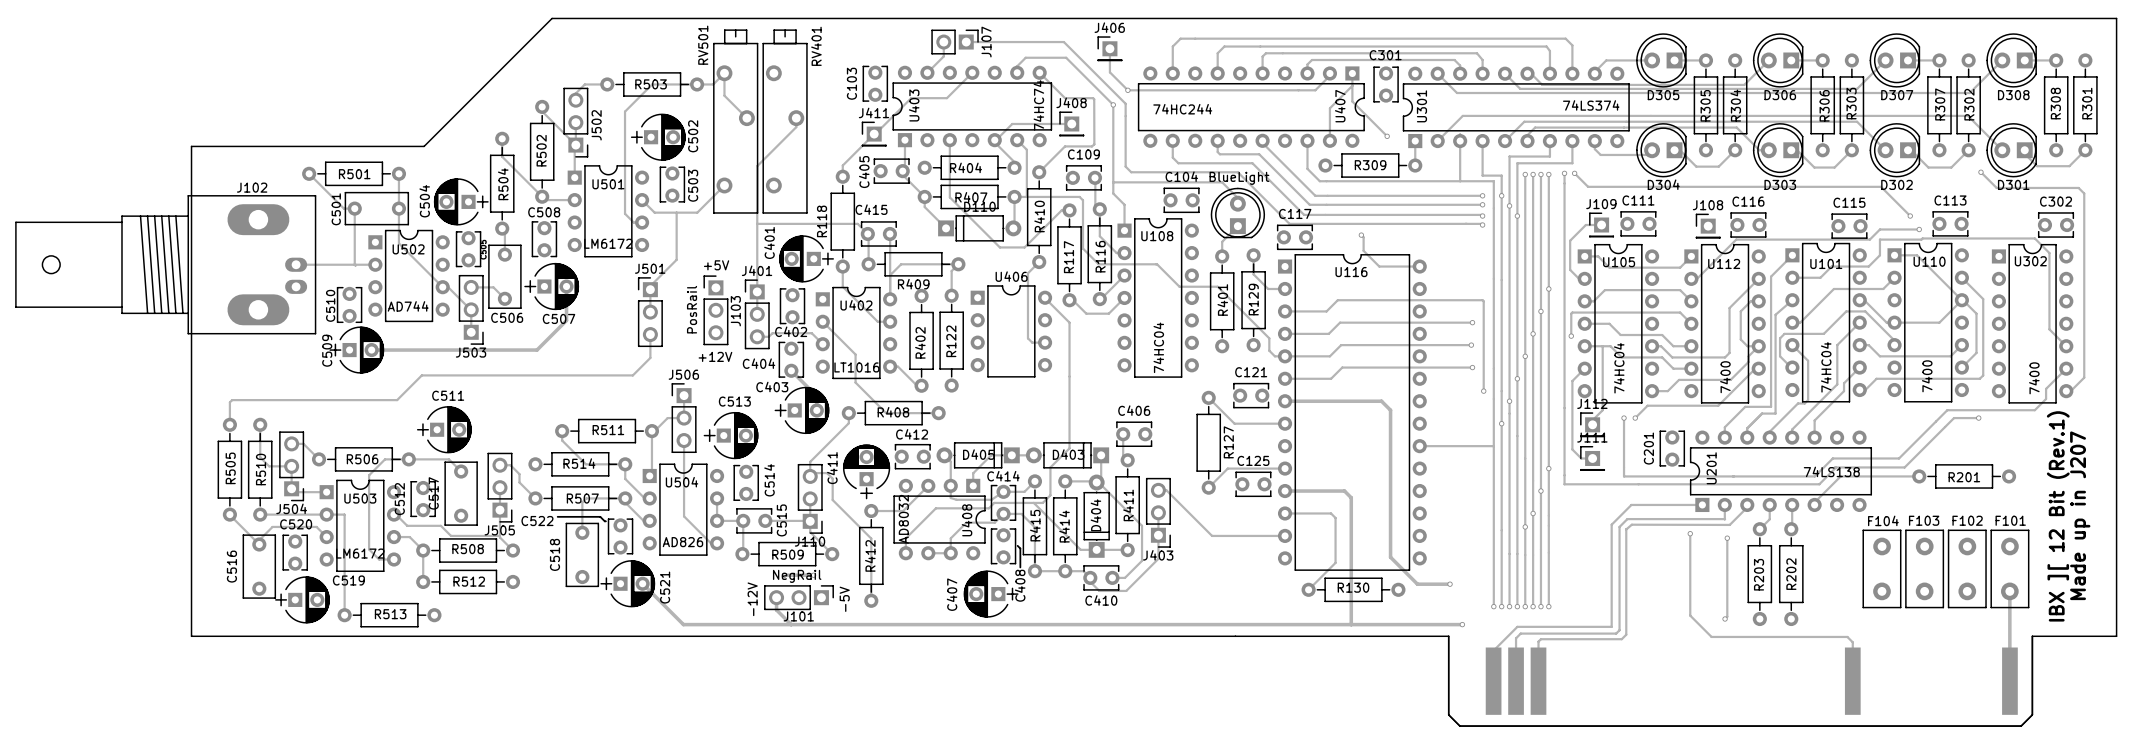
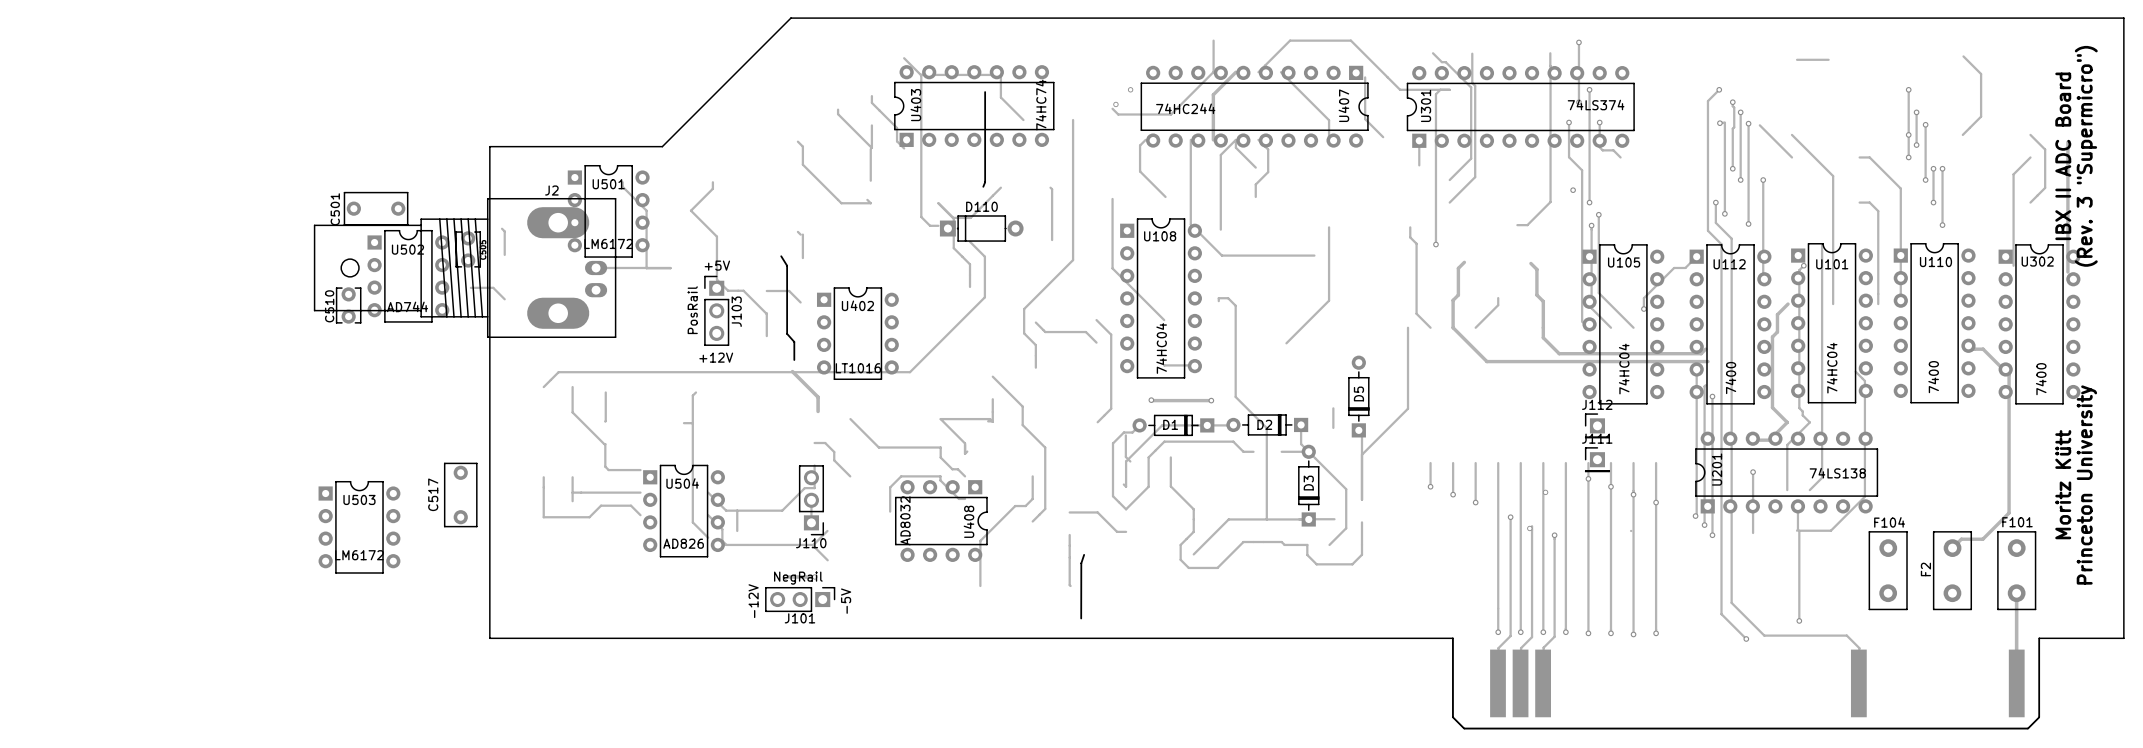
board edge: (2116, 18) (552, 18) (424, 146) (191, 146) (191, 636) (490, 636) -> (2123, 18) (790, 18) (662, 146) (489, 146) (489, 638)
track: none -> (1213, 40) (1213, 71) (1171, 114) (1118, 114) (1112, 108)
track: (943, 42) (943, 56) (927, 72) -> none
J107: (955, 42) -> none
track: (966, 42) (1063, 42) (1125, 103) (1125, 166) (1131, 172) (1237, 172) (1289, 223) (1482, 225) -> none
track: none -> (1578, 42) (1578, 102)
via: none -> (1578, 42)
track: (1109, 48) (1109, 72) (1127, 90) (1315, 90) (1329, 73) -> none
J406: (1109, 48) -> none
track: none -> (1433, 53) (1441, 62) (1445, 62) (1471, 87) (1471, 158) (1449, 180)
track: none -> (1550, 53) (1550, 202) (1527, 225) (1517, 225)
track: none -> (1472, 53) (1472, 82) (1475, 85) (1475, 177) (1449, 202)
track: none -> (1963, 56) (1981, 74) (1981, 116) (1962, 134)
track: none -> (904, 58) (920, 74) (1000, 74) (1000, 97) (1023, 120)
track: (1652, 60) (1606, 60) (1594, 73) -> none
D305: (1661, 60) -> none
track: (1674, 60) (1705, 60) -> none
track: (1768, 60) (1744, 84) (1542, 84) (1527, 70) -> none
D306: (1778, 60) -> none
track: (1885, 60) (1857, 88) (1520, 88) (1505, 73) -> none
D307: (1894, 60) -> none
track: (1908, 60) (1939, 60) -> none
track: (2002, 60) (1969, 93) (1457, 93) (1437, 73) -> none
D308: (2011, 60) -> none
track: (2024, 60) (2056, 60) -> none
track: (972, 72) (946, 98) (911, 98) (842, 165) (842, 176) -> none
track: (1017, 72) (1017, 66) (1025, 57) (1066, 57) (1113, 104) (1113, 193) (1124, 204) (1124, 230) -> none
track: (1039, 72) (1065, 98) (1094, 99) (1094, 144) (1091, 146) (1065, 146) (1039, 172) -> none
track: none -> (1235, 72) (1213, 94) (1213, 139)
track: none -> (1258, 72) (1290, 40) (1350, 40) (1400, 89) (1449, 89)
track: none -> (1281, 72) (1329, 120) (1329, 137)
track: (1172, 73) (1172, 46) (1180, 38) (1565, 38) (1572, 45) (1572, 73) -> none
track: (1217, 73) (1217, 53) (1224, 46) (1546, 46) (1549, 51) (1549, 73) -> none
track: (1262, 73) (1262, 56) (1265, 53) (1476, 53) (1482, 60) (1482, 73) -> none
track: (1307, 73) (1307, 64) (1311, 60) (1454, 60) (1460, 65) (1460, 73) -> none
track: (1352, 73) (1352, 101) (1387, 136) -> none
track: none -> (921, 74) (921, 217) (930, 225) (938, 225)
track: none -> (1365, 77) (1365, 119) (1383, 137)
C103: (875, 83) -> none
track: (607, 84) (584, 84) (575, 93) (575, 100) -> none
R503: (652, 84) -> none
C301: (1386, 84) -> none
track: (1352, 85) (1329, 108) (1329, 140) -> none
track: none -> (1440, 89) (1435, 94) (1435, 244)
track: none -> (1589, 89) (1589, 202)
via: none -> (1589, 89)
track: none -> (1719, 89) (1707, 101) (1707, 230) (1721, 244) (1721, 614) (1746, 638)
via: none -> (1719, 89)
track: none -> (1908, 89) (1908, 157)
via: none -> (1908, 89)
line: none -> (985, 92) (985, 182) (983, 186)
track: none -> (871, 96) (871, 102) (897, 128) (897, 141) (904, 148)
via: none -> (1578, 102)
track: none -> (1732, 102) (1732, 168)
via: none -> (1732, 102)
R305: (1705, 105) -> none
R304: (1735, 105) -> none
R306: (1822, 105) -> none
R303: (1851, 105) -> none
R307: (1939, 105) -> none
R302: (1968, 105) -> none
R308: (2056, 105) -> none
R301: (2085, 105) -> none
track: (542, 106) (542, 111) (575, 145) (575, 122) -> none
track: none -> (838, 109) (838, 114) (871, 148) (871, 125)
track: none -> (1740, 112) (1740, 180)
via: none -> (1740, 112)
track: none -> (1916, 112) (1916, 145)
via: none -> (1916, 112)
track: (746, 118) (724, 95) (724, 73) (713, 84) (652, 84) (625, 111) (625, 213) (633, 222) (642, 222) -> none
track: (796, 118) (796, 127) (757, 166) (757, 314) -> none
track: none -> (1073, 120) (1073, 260) (1024, 309) (1024, 333) (1035, 345) (1035, 367)
RV501: (735, 121) -> none
RV401: (785, 121) -> none
J502: (575, 122) -> none
track: none -> (1569, 122) (1569, 157) (1582, 170) (1582, 321) (1588, 327)
via: none -> (1569, 122)
track: none -> (1599, 122) (1599, 140)
via: none -> (1599, 122)
track: (1071, 123) (1012, 123) (994, 140) (994, 142) (1015, 163) -> none
J408: (1071, 123) -> none
track: none -> (1720, 122) (1724, 122) (1724, 213)
via: none -> (1719, 123)
track: none -> (1748, 123) (1748, 224)
via: none -> (1748, 123)
track: none -> (1759, 125) (1791, 157)
track: none -> (1925, 124) (1925, 180)
via: none -> (1925, 124)
J411: (874, 134) -> none
track: (1460, 134) (1460, 181) -> none
track: (1549, 135) (1549, 156) (1509, 156) (1509, 606) -> none
track: none -> (1791, 134) (1833, 176) (1833, 304)
via: none -> (1908, 134)
track: none -> (2030, 134) (2045, 149) (2045, 187) (2030, 202)
via: (1387, 136) -> none
C502: (658, 137) -> none
track: (502, 138) (502, 156) (545, 200) (574, 200) (571, 196) -> none
track: (904, 140) (904, 168) (902, 171) -> none
track: (949, 140) (949, 197) (999, 247) (1024, 247) (1061, 210) (1069, 210) -> none
track: (1017, 140) (1026, 149) (1026, 196) -> none
track: none -> (1145, 139) (1140, 145) (1140, 171) (1165, 196)
track: (1172, 140) (1172, 157) (1178, 163) (1252, 163) (1304, 214) (1482, 216) -> none
track: none -> (1190, 139) (1190, 224) (1221, 255) (1314, 255)
track: (1217, 140) (1217, 152) (1219, 154) (1259, 154) (1309, 204) (1482, 204) -> none
track: none -> (1258, 139) (1268, 149) (1268, 172) (1255, 184) (1255, 196)
track: (1262, 140) (1262, 143) (1315, 195) (1482, 195) -> none
track: (1307, 140) (1307, 168) (1319, 181) (1493, 181) (1493, 297) -> none
track: none -> (797, 141) (802, 146) (802, 164) (841, 203) (870, 203) (867, 199)
track: (1437, 141) (1462, 115) (1967, 115) (2002, 150) -> none
track: (1482, 141) (1482, 175) (1501, 175) (1501, 606) -> none
track: (1505, 141) (1524, 121) (1857, 121) (1885, 150) -> none
track: (1527, 141) (1527, 135) (1535, 127) (1736, 127) (1759, 150) (1768, 150) -> none
track: (1572, 141) (1572, 163) (1517, 163) (1517, 606) -> none
track: none -> (2067, 142) (2067, 272)
via: none -> (1916, 145)
track: (574, 146) (574, 177) -> none
track: (1594, 147) (1600, 154) (1647, 154) (1652, 150) -> (1599, 147) (1602, 150) (1613, 150) (1620, 157)
track: none -> (870, 149) (870, 180)
D304: (1661, 150) -> none
track: (1674, 150) (1679, 150) (1696, 166) (1718, 166) (1735, 150) -> none
D303: (1778, 150) -> none
track: (1791, 150) (1797, 150) (1814, 167) (1834, 167) (1851, 150) -> none
D302: (1894, 150) -> none
track: (1908, 150) (1911, 150) (1928, 167) (1951, 167) (1968, 150) -> none
D301: (2011, 150) -> none
track: (2024, 150) (2024, 153) (2037, 166) (2069, 166) (2085, 150) -> none
R502: (542, 151) -> none
text: none -> IBX II ADC Board (2063, 156)
text: none -> (Rev. 3 "Supermicro") (2086, 156)
track: none -> (1859, 157) (1869, 157) (1900, 188) (1900, 304)
via: none -> (1908, 157)
track: none -> (2030, 157) (2013, 174) (2013, 265)
R309: (1370, 165) -> none
R404: (969, 167) -> none
track: none -> (1255, 167) (1235, 147) (1235, 139) (1220, 154) (1220, 229)
via: none -> (1732, 168)
track: none -> (1933, 168) (1933, 202)
via: none -> (1933, 168)
track: none -> (1942, 168) (1942, 225)
via: none -> (1942, 168)
C405: (891, 171) -> none
track: (902, 171) (902, 174) (924, 196) (924, 207) (946, 228) -> none
track: (1980, 172) (1996, 187) (2078, 187) (2084, 193) (2084, 377) (2070, 391) (2066, 391) -> none
via: (1980, 172) -> none
track: (309, 173) (343, 208) (354, 208) (355, 264) -> none
R501: (354, 173) -> none
track: (398, 173) (398, 243) (442, 287) (448, 287) (471, 309) (471, 332) -> none
track: (1564, 173) (1564, 484) (1819, 484) (1836, 467) -> none
via: (1564, 173) -> none
track: (1574, 173) (1588, 186) (1881, 186) (1910, 216) -> none
via: (1574, 173) -> none
track: (1525, 174) (1525, 606) -> none
via: (1525, 174) -> none
track: (1533, 174) (1533, 606) -> none
via: (1533, 174) -> none
track: (1540, 174) (1540, 606) -> none
via: (1540, 174) -> none
track: (1548, 174) (1548, 606) -> none
via: (1548, 174) -> none
C109: (1083, 177) -> none
via: none -> (1740, 180)
track: none -> (1763, 180) (1763, 281)
via: none -> (1763, 180)
via: none -> (1925, 180)
track: none -> (622, 182) (622, 186) (646, 210) (646, 268) (670, 268) (670, 267) (596, 267)
track: none -> (712, 182) (712, 188) (690, 210) (716, 236) (716, 279) (728, 290) (743, 290) (766, 313) (766, 336)
track: (1095, 182) (1095, 204) (1099, 209) (1099, 236) (1116, 253) (1124, 253) -> none
track: (1113, 182) (1222, 182) (1237, 198) (1237, 203) -> none
R504: (502, 183) -> none
C503: (672, 184) -> none
track: (724, 185) (697, 212) (654, 212) (642, 200) -> none
track: none -> (1000, 187) (970, 217) (953, 217)
track: none -> (1050, 187) (1052, 189) (1052, 240)
via: none -> (1573, 190)
via: (1482, 195) -> none
via: (1501, 195) -> none
R407: (969, 196) -> none
track: none -> (1112, 198) (1112, 268) (1164, 320)
C104: (1181, 200) -> none
C504: (461, 201) -> none
via: none -> (1589, 202)
track: none -> (1715, 202) (1715, 222) (1731, 238) (1731, 602) (1764, 635) (1846, 635) (1859, 648) (1859, 684)
via: none -> (1715, 202)
track: none -> (1859, 202) (1869, 202) (1878, 211) (1878, 304)
via: none -> (1933, 202)
track: none -> (938, 203) (953, 218) (953, 248) (970, 264) (970, 286)
via: (1482, 204) -> none
via: (1509, 205) -> none
track: (676, 212) (676, 259) (650, 286) (650, 312) -> none
BlueLight: (1237, 213) -> none
via: none -> (1724, 213)
track: none -> (1598, 214) (1598, 293) (1633, 327)
via: none -> (1598, 214)
via: (1482, 216) -> none
via: (1517, 216) -> none
via: (1910, 216) -> none
R410: (1039, 217) -> none
R118: (842, 221) -> none
track: (757, 223) (857, 223) (868, 234) (868, 264) -> none
C111: (1638, 223) -> none
via: none -> (1748, 224)
C113: (1950, 223) -> none
via: (1482, 225) -> none
track: none -> (1591, 225) (1591, 308) (1610, 327)
via: none -> (1591, 225)
track: (1601, 225) (1585, 225) (1570, 240) (1570, 269) (1579, 278) (1584, 278) -> none
J109: (1601, 225) -> none
C116: (1748, 225) -> none
via: none -> (1942, 225)
C302: (2056, 225) -> none
track: (1237, 226) (1222, 241) (1222, 256) -> none
J108: (1708, 226) -> none
C115: (1849, 226) -> none
track: none -> (1329, 227) (1329, 300) (1286, 343)
track: none -> (1410, 227) (1410, 237) (1416, 243) (1416, 313) (1430, 327)
track: (1013, 228) (1014, 196) (1079, 196) (1082, 200) (1082, 248) (1098, 264) (1157, 264) (1179, 286) (1217, 286) (1269, 338) (1269, 350) (1274, 356) (1329, 356) (1341, 345) (1471, 345) -> none
track: (1919, 229) (1879, 229) (1869, 239) (1736, 239) (1696, 278) (1691, 278) -> none
via: (1919, 229) -> none
track: none -> (797, 231) (800, 234)
C415: (878, 233) -> none
track: (889, 233) (890, 299) -> none
track: none -> (802, 234) (802, 258)
track: (1361, 235) (1363, 237) (1363, 250) (1379, 266) (1419, 266) -> none
via: (1361, 235) -> none
C117: (1294, 237) -> none
C508: (544, 239) -> none
track: none -> (970, 241) (984, 256) (984, 297) (910, 372) (558, 372) (543, 387)
via: none -> (1435, 244)
track: none -> (1822, 244) (1822, 477) (1809, 490)
R116: (1099, 254) -> none
line: none -> (781, 256) (787, 265) (787, 333) (794, 341) (794, 360)
R117: (1069, 255) -> none
track: (1253, 255) (1253, 274) (1268, 288) (1285, 288) -> none
track: (1792, 255) (1771, 276) (1771, 406) (1745, 406) (1724, 427) (1724, 441) -> none
track: (1894, 255) (1917, 255) (1961, 300) -> none
track: (1584, 256) (1598, 256) (1609, 267) (1668, 267) -> (1643, 309) (1643, 298) (1674, 267)
C401: (806, 258) -> none
track: (1039, 262) (1027, 273) (1027, 338) (1032, 342) (1045, 342) -> none
track: none -> (1464, 262) (1458, 268) (1458, 295) (1453, 300) (1453, 327) (1486, 361) (1707, 361)
track: none -> (1530, 263) (1536, 269) (1536, 295) (1543, 301) (1543, 337) (1559, 353) (1701, 353) (1705, 349)
J102: (165, 264) -> none
track: (296, 264) (375, 264) -> none
R409: (913, 264) -> none
track: none -> (1803, 265) (1799, 270) (1799, 408) (1802, 411) (1802, 415) (1809, 422) (1787, 444) (1787, 490)
via: none -> (1803, 265)
track: (842, 266) (842, 286) (877, 321) (890, 321) -> none
J2: none -> (465, 267)
track: (890, 275) (901, 264) (958, 264) (951, 271) (951, 295) -> none
track: (1121, 275) (1124, 275) (1099, 299) -> none
C506: (504, 276) -> none
track: (1792, 277) (1820, 277) (1831, 266) (1868, 266) (1879, 255) (1879, 239) (2034, 238) (2049, 253) (2049, 329) (2066, 346) -> none
track: (1894, 277) (1883, 288) (1833, 288) (1800, 322) (1792, 322) -> none
track: (1961, 277) (1983, 299) (1983, 375) (1979, 378) (1876, 378) (1865, 390) (1859, 390) -> none
track: (1758, 278) (1729, 308) (1729, 352) (1725, 357) (1672, 357) (1661, 346) (1652, 346) -> none
C507: (551, 286) -> none
track: (566, 286) (566, 320) (537, 350) (371, 350) -> none
via: (1548, 288) -> none
track: none -> (766, 290) (789, 290) (800, 302)
track: (1045, 297) (1069, 322) (1069, 448) (1050, 467) (1050, 495) (1042, 502) (994, 502) (988, 508) (935, 508) (905, 538) (905, 553) -> none
track: (1124, 297) (1108, 313) (1086, 313) (1072, 300) (1069, 300) -> none
track: none -> (1218, 301) (1218, 298) (1228, 298) (1235, 305) (1235, 396) (1266, 428) (1266, 519)
R129: (1253, 300) -> none
track: (1792, 300) (1775, 314) (1775, 413) (1762, 413) (1747, 428) (1748, 437) -> none
track: (1859, 300) (1864, 300) (1886, 322) (1939, 322) (1961, 300) -> none
track: (1961, 300) (1976, 313) (1976, 352) (1961, 367) -> none
R401: (1222, 301) -> none
track: (1584, 301) (1593, 301) (1604, 290) (1680, 290) (1691, 301) -> none
track: (1758, 301) (1750, 301) (1740, 311) (1740, 339) (1747, 346) (1758, 346) (1748, 356) (1748, 361) (1730, 379) (1679, 379) (1667, 391) (1652, 391) -> none
track: none -> (1788, 304) (1777, 314) (1777, 332) (1772, 337) (1772, 407) (1787, 422) (1769, 440) (1757, 440)
track: (1493, 304) (1493, 461) -> (1498, 305) (1475, 327)
C402: (792, 306) -> none
via: none -> (1643, 309)
J503: (471, 309) -> none
track: (1285, 311) (1326, 311) (1337, 300) (1482, 300) (1483, 391) -> none
via: (1540, 311) -> none
J501: (650, 312) -> none
J401: (757, 314) -> none
track: none -> (1096, 320) (1111, 334) (1111, 408) (1097, 422)
track: (822, 321) (855, 354) (855, 382) (886, 413) (938, 413) -> none
track: none -> (1035, 322) (1045, 332) (1085, 332) (1096, 342)
track: (1472, 322) (1340, 322) (1328, 333) (1285, 333) -> none
via: (1472, 322) -> none
track: (1859, 322) (1837, 345) (1837, 384) (1792, 429) (1792, 437) -> none
track: (1584, 323) (1609, 323) (1620, 335) (1662, 335) (1673, 346) (1691, 346) -> none
track: (1691, 323) (1680, 312) (1572, 312) (1571, 336) (1572, 335) -> none
track: none -> (1408, 327) (1408, 408) (1361, 454)
U406: (1011, 331) -> none
via: (1533, 333) -> none
track: (650, 334) (650, 357) (632, 375) (421, 375) (397, 400) (232, 400) (229, 402) (229, 424) -> none
track: (757, 336) (768, 336) (772, 333) (811, 333) (822, 344) -> none
via: (1571, 336) -> none
R402: (921, 340) -> none
R122: (951, 340) -> none
via: (1471, 345) -> none
track: (1792, 345) (1808, 360) (1808, 400) (1804, 403) (1798, 403) (1769, 431) (1769, 437) -> none
track: (1859, 345) (1868, 345) (1879, 356) (1950, 356) (1961, 345) -> none
track: (1894, 345) (1894, 340) (1865, 311) (1846, 311) (1823, 333) (1784, 333) (1780, 338) (1780, 356) (1792, 367) -> none
track: (1584, 346) (1610, 346) (1621, 357) (1662, 357) (1673, 368) (1691, 368) -> none
track: (1602, 346) (1602, 410) (1592, 420) (1592, 424) -> none
track: none -> (1970, 349) (1983, 349) (2009, 375) (2009, 513) (1982, 539) (1961, 539) (1952, 548)
C509: (356, 350) -> none
via: (1525, 356) -> none
C404: (791, 359) -> none
track: none -> (1164, 365) (1191, 365)
track: (890, 366) (898, 366) (917, 385) (921, 385) -> none
track: (1472, 367) (1342, 367) (1331, 378) (1285, 378) -> none
via: (1472, 367) -> none
track: (1859, 367) (1844, 383) (1844, 391) (1814, 420) (1814, 437) -> none
track: (1584, 368) (1572, 381) (1572, 449) (1581, 458) (1592, 458) -> none
track: (1758, 368) (1755, 368) (1718, 405) (1647, 405) (1635, 418) -> none
track: (2061, 368) (2066, 368) (2046, 388) (2046, 398) (2034, 410) (1947, 410) (1899, 458) (1832, 458) (1814, 476) (1624, 476) (1624, 418) -> none
track: none -> (1696, 371) (1695, 516)
track: none -> (1855, 371) (1864, 380) (1864, 496) (1830, 530) (1799, 530) (1799, 620)
track: none -> (992, 376) (1022, 406) (1022, 425) (1045, 447) (1045, 508) (1032, 521)
via: (1517, 378) -> none
track: none -> (1705, 385) (1704, 525)
track: none -> (572, 387) (572, 412) (605, 444) (605, 466) (608, 470) (640, 470)
track: none -> (605, 392) (605, 421)
track: none -> (695, 392) (692, 395) (692, 522) (708, 537)
via: (1483, 391) -> none
track: (684, 395) (684, 418) (667, 418) (654, 431) (651, 431) (651, 473) (649, 475) -> none
C121: (1251, 395) -> none
D5: none -> (1358, 396)
track: none -> (1712, 396) (1712, 535)
via: none -> (1712, 396)
track: (1208, 397) (1234, 423) (1285, 423) -> none
track: none -> (992, 399) (992, 421) (990, 419) (940, 419) (965, 443) (965, 453) (967, 451)
track: none -> (1151, 400) (1211, 400)
via: none -> (1151, 400)
via: none -> (1211, 400)
track: (1285, 401) (1381, 401) (1390, 410) (1390, 557) (1417, 584) (1450, 584) -> none
via: (1509, 401) -> none
track: none -> (1333, 408) (1333, 427)
C403: (801, 410) -> none
U116: (1352, 412) -> none
track: (848, 413) (848, 423) (810, 461) (810, 473) (827, 473) (832, 478) (832, 500) (871, 538) (871, 600) -> none
R408: (893, 413) -> none
J506: (684, 418) -> none
track: none -> (850, 419) (878, 447) (940, 447) (940, 457) (952, 469) (957, 469) (965, 476)
via: (1624, 418) -> none
via: (1635, 418) -> none
track: (1978, 418) (1954, 418) (1904, 467) (1835, 467) -> none
via: (1978, 418) -> none
track: none -> (988, 421) (992, 421)
track: none -> (683, 423) (692, 423)
track: none -> (1233, 424) (1162, 425) (1126, 461) (1126, 486) (1123, 484)
D2: none -> (1267, 424)
track: none -> (1301, 424) (1301, 444) (1346, 489) (1346, 528) (1329, 544)
via: (1501, 423) -> none
track: (260, 424) (260, 457) (269, 466) (291, 466) (291, 488) (295, 492) (326, 492) -> none
track: none -> (1139, 425) (1132, 432) (1123, 432) (1113, 443) (1113, 496) (1126, 509) (1148, 486) (1148, 457) (1164, 441) (1233, 441) (1243, 451) (1253, 451)
D1: none -> (1173, 425)
C511: (444, 429) -> none
track: none -> (1358, 430) (1361, 433) (1361, 499)
track: (562, 431) (562, 440) (585, 464) (625, 464) (625, 478) (644, 498) (649, 498) -> none
R511: (607, 431) -> none
C406: (1134, 434) -> none
C513: (731, 435) -> none
track: (684, 440) (684, 516) (711, 543) (717, 543) -> none
track: none -> (814, 443) (825, 443) (834, 452) (834, 460) (850, 476)
R127: (1208, 442) -> none
track: (291, 443) (303, 443) (319, 459) -> none
track: (1419, 446) (1493, 446) -> none
C201: (1672, 448) -> none
track: none -> (1281, 451) (1308, 451)
track: (944, 455) (950, 461) (950, 497) (956, 499) (991, 499) (1003, 491) (1024, 491) (1034, 481) -> none
D405: (978, 455) -> none
track: (1033, 455) (991, 455) (973, 473) (973, 485) -> none
D403: (1067, 455) -> none
track: (1101, 455) (1101, 478) (1096, 482) -> none
C412: (912, 456) -> none
track: none -> (1170, 457) (1170, 486) (1193, 509) (1193, 531) (1180, 544) (1180, 559) (1188, 567) (1217, 567) (1243, 542) (1281, 542) (1284, 544) (1307, 544) (1307, 554) (1316, 564) (1352, 564) (1361, 554) (1361, 522)
R506: (363, 459) -> none
track: none -> (1430, 463) (1430, 486)
track: none -> (1453, 463) (1453, 494)
track: none -> (1475, 463) (1475, 502)
track: none -> (1520, 463) (1520, 632)
track: none -> (1543, 463) (1543, 632)
track: none -> (1565, 463) (1565, 632)
track: none -> (1588, 463) (1588, 633)
track: none -> (1610, 463) (1610, 633)
track: none -> (1633, 463) (1633, 634)
track: none -> (1656, 463) (1656, 633)
R514: (580, 464) -> none
track: none -> (814, 465) (814, 488) (804, 488) (782, 510) (726, 510) (708, 492)
track: (499, 465) (510, 465) (519, 474) (519, 482) (535, 498) -> none
J504: (291, 466) -> none
track: (1285, 468) (1227, 468) (1208, 487) -> none
via: (1548, 468) -> none
R505: (229, 469) -> none
R510: (260, 469) -> none
track: none -> (1753, 472) (1753, 532)
via: none -> (1753, 472)
track: (461, 471) (448, 459) (385, 459) (369, 475) (369, 549) (379, 559) (394, 559) -> none
C411: (866, 471) -> none
track: none -> (543, 477) (543, 517) (589, 517) (601, 505) (631, 505) (640, 515)
track: none -> (572, 477) (572, 501)
track: none -> (1032, 476) (1032, 498) (1025, 506) (1015, 506) (980, 540) (980, 585)
track: (1919, 476) (1840, 476) (1814, 502) (1814, 504) -> none
R201: (1964, 476) -> none
via: none -> (1588, 478)
track: (1065, 481) (1096, 482) -> none
C514: (746, 482) -> none
track: (1096, 482) (1142, 525) (1142, 560) (1124, 577) (1112, 577) -> none
text: none -> Moritz Kütt (2063, 484)
text: none -> Princeton University (2086, 484)
C125: (1253, 484) -> none
D3: none -> (1308, 485)
track: (928, 485) (903, 511) (871, 511) -> none
via: none -> (1430, 486)
via: none -> (1610, 486)
track: (499, 487) (499, 537) (513, 550) -> none
J505: (499, 487) -> none
track: (1158, 490) (1166, 490) (1212, 535) (1285, 535) -> none
track: none -> (572, 492) (640, 492)
track: (1285, 491) (1344, 491) (1351, 497) (1351, 624) -> none
via: none -> (1453, 494)
via: none -> (1633, 494)
track: none -> (965, 498) (958, 498) (940, 480) (940, 476) (901, 476) (890, 487) (890, 511)
R507: (580, 498) -> none
track: (717, 498) (717, 520) (743, 520) (742, 554) -> none
C512: (423, 499) -> none
via: none -> (1475, 502)
via: none -> (1656, 502)
C414: (1003, 502) -> none
track: (1033, 502) (1080, 549) (1127, 550) -> none
track: (1702, 504) (1631, 504) (1611, 524) (1611, 626) (1517, 626) (1493, 650) (1493, 681) -> none
track: (1724, 504) (1724, 519) (1627, 519) (1619, 526) (1619, 630) (1616, 633) (1520, 633) (1516, 638) (1516, 681) -> none
track: (1747, 504) (1747, 507) (1729, 524) (1631, 524) (1626, 529) (1626, 634) (1621, 639) (1540, 639) (1538, 641) (1538, 681) -> none
track: (1769, 504) (1769, 519) (1759, 529) -> none
R411: (1127, 505) -> none
track: none -> (737, 510) (737, 530)
track: none -> (1069, 512) (1097, 512) (1117, 531) (1126, 531)
track: (1158, 512) (1158, 558) (1126, 590) (1099, 590) (1083, 571) (1034, 571) (1034, 527) (1021, 513) (1003, 513) (994, 522) (966, 522) (950, 538) (950, 553) (928, 553) -> none
J403: (1158, 512) -> none
track: none -> (708, 515) (722, 529) (722, 540) (726, 544) (813, 544)
track: (1285, 513) (1331, 513) (1335, 517) (1335, 562) (1308, 589) -> none
via: (1533, 513) -> none
track: (229, 514) (259, 544) (259, 540) (272, 526) (316, 526) (326, 537) -> none
track: (260, 514) (344, 514) (344, 615) -> none
track: (394, 514) (407, 525) (440, 525) (451, 535) (499, 535) -> none
via: none -> (1695, 516)
track: none -> (1510, 517) (1510, 636) (1498, 648) (1498, 684)
via: none -> (1510, 517)
text: Made up in J207 (2080, 515) -> none
line: (557, 516) (600, 516) (605, 521) -> none
D404: (1096, 516) -> none
text: IBX ][ 12 Bit (Rev.1) (2058, 516) -> none
track: (810, 517) (810, 532) (832, 554) -> none
track: none -> (1334, 519) (1228, 519) (1193, 554)
track: (649, 520) (643, 520) (625, 502) (625, 498) (586, 498) (582, 502) (582, 532) -> none
C515: (754, 520) -> none
track: (765, 520) (806, 520) -> none
via: none -> (1704, 525)
track: none -> (1532, 526) (1532, 637) (1521, 648) (1521, 684)
R415: (1034, 526) -> none
R414: (1065, 526) -> none
track: none -> (827, 530) (813, 544)
track: none -> (1069, 535) (1070, 585)
track: none -> (1554, 535) (1554, 636) (1543, 647) (1543, 684)
via: none -> (1554, 535)
track: (1690, 533) (1690, 615) (1711, 636) (1847, 636) (1852, 642) (1852, 681) -> none
via: (1690, 533) -> none
via: none -> (1712, 535)
C522: (620, 536) -> none
track: (394, 537) (409, 537) (423, 550) (423, 581) -> none
track: (1727, 538) (1727, 616) (1725, 619) -> none
via: (1727, 538) -> none
track: none -> (813, 544) (827, 560)
line: (1017, 545) (1020, 548) (1020, 567) -> none
C408: (1003, 546) -> none
R508: (468, 550) -> none
C520: (295, 552) -> none
line: none -> (1084, 554) (1081, 563) (1081, 618)
C518: (582, 554) -> none
R509: (787, 554) -> none
R412: (871, 555) -> none
C516: (259, 566) -> none
F103: (1924, 568) -> none
F2: none -> (1952, 570)
F102: (1967, 568) -> none
R203: (1759, 574) -> none
R202: (1791, 574) -> none
C410: (1101, 577) -> none
R512: (468, 581) -> none
C521: (627, 583) -> none
track: (642, 583) (683, 624) (1462, 624) -> none
via: (1450, 584) -> none
R130: (1353, 589) -> none
C407: (991, 594) -> none
track: (776, 597) (776, 610) (791, 624) -> none
C519: (302, 599) -> none
track: none -> (1498, 608) (1498, 632)
via: (1493, 606) -> none
via: (1501, 606) -> none
via: (1509, 606) -> none
via: (1517, 606) -> none
via: (1525, 606) -> none
via: (1533, 606) -> none
via: (1540, 606) -> none
via: (1548, 606) -> none
R513: (389, 615) -> none
via: (1725, 619) -> none
via: none -> (1799, 620)
via: (1462, 624) -> none
via: none -> (1498, 632)
via: none -> (1520, 632)
via: none -> (1543, 632)
via: none -> (1565, 632)
via: none -> (1588, 633)
via: none -> (1610, 633)
via: none -> (1656, 633)
via: none -> (1633, 634)
via: none -> (1746, 638)

